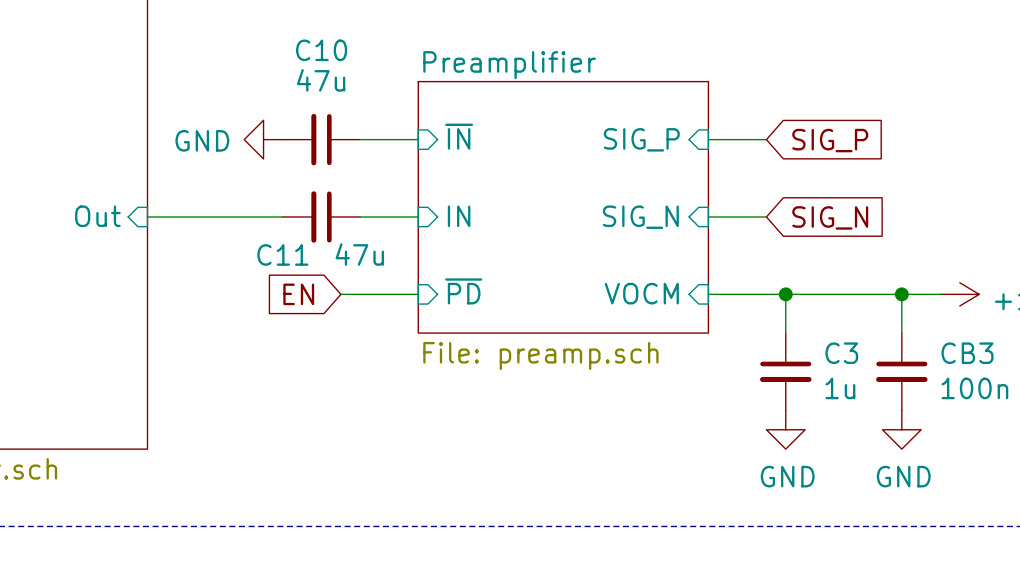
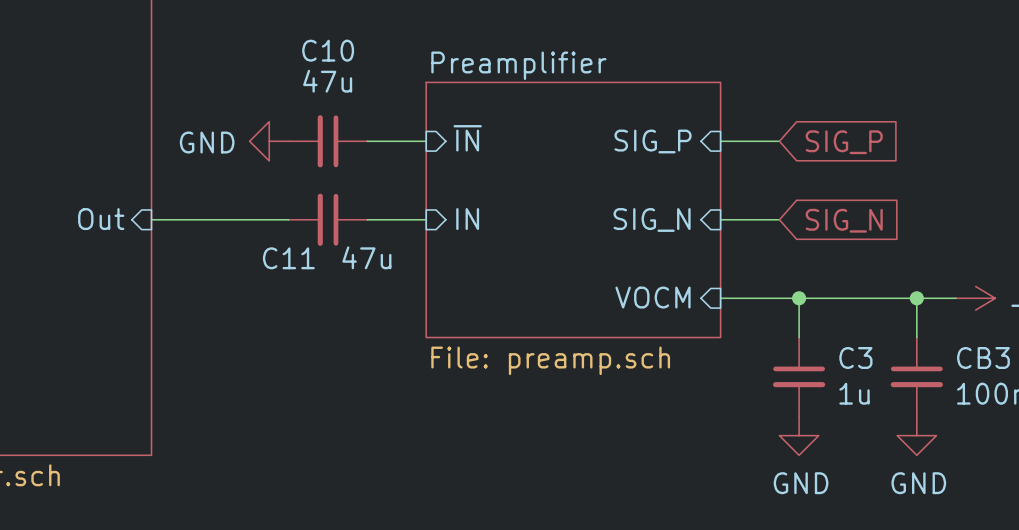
sheet pin: ~{PD} (463, 291) -> none
global label: EN (298, 294) -> none
wire: (340, 294) (418, 294) -> none

